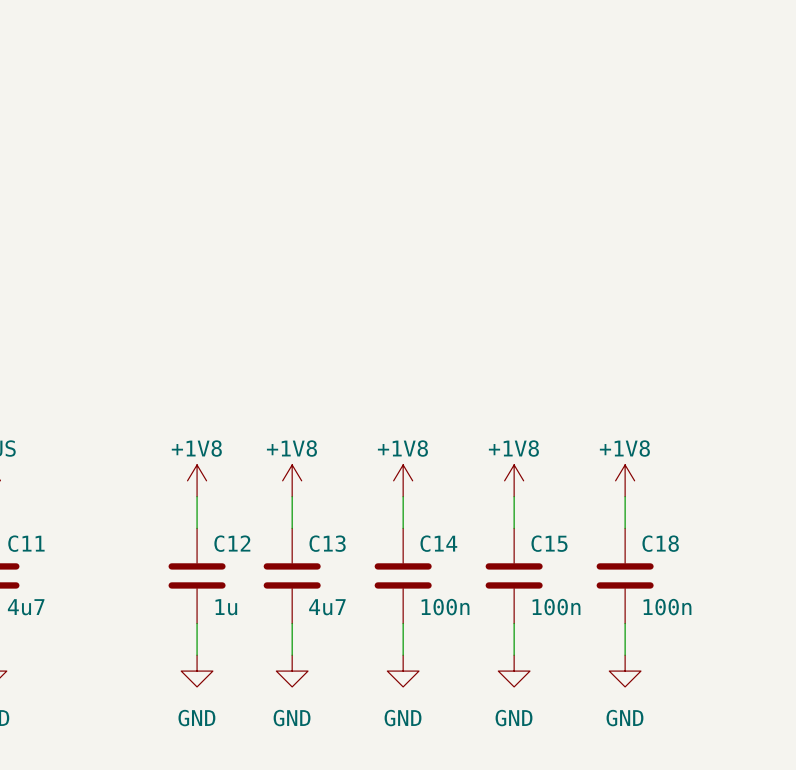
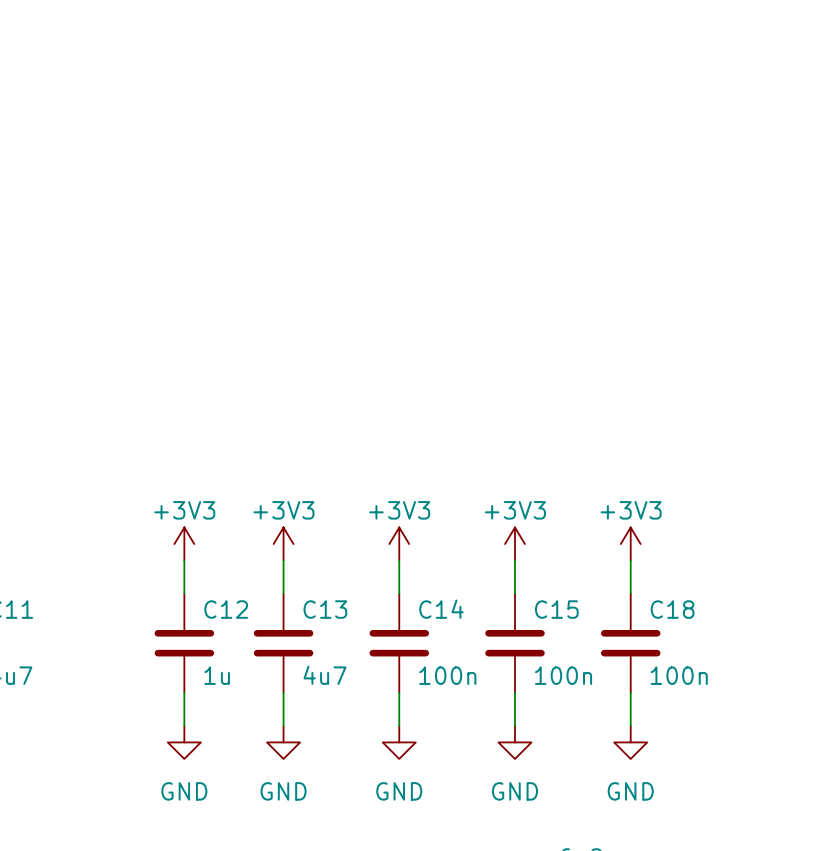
power symbol: +1V8 (197, 480) -> +3V3 (184, 544)
power symbol: +1V8 (292, 480) -> +3V3 (283, 544)
power symbol: +1V8 (403, 480) -> +3V3 (399, 544)
power symbol: +1V8 (514, 480) -> +3V3 (514, 544)
power symbol: +1V8 (625, 480) -> +3V3 (630, 544)

